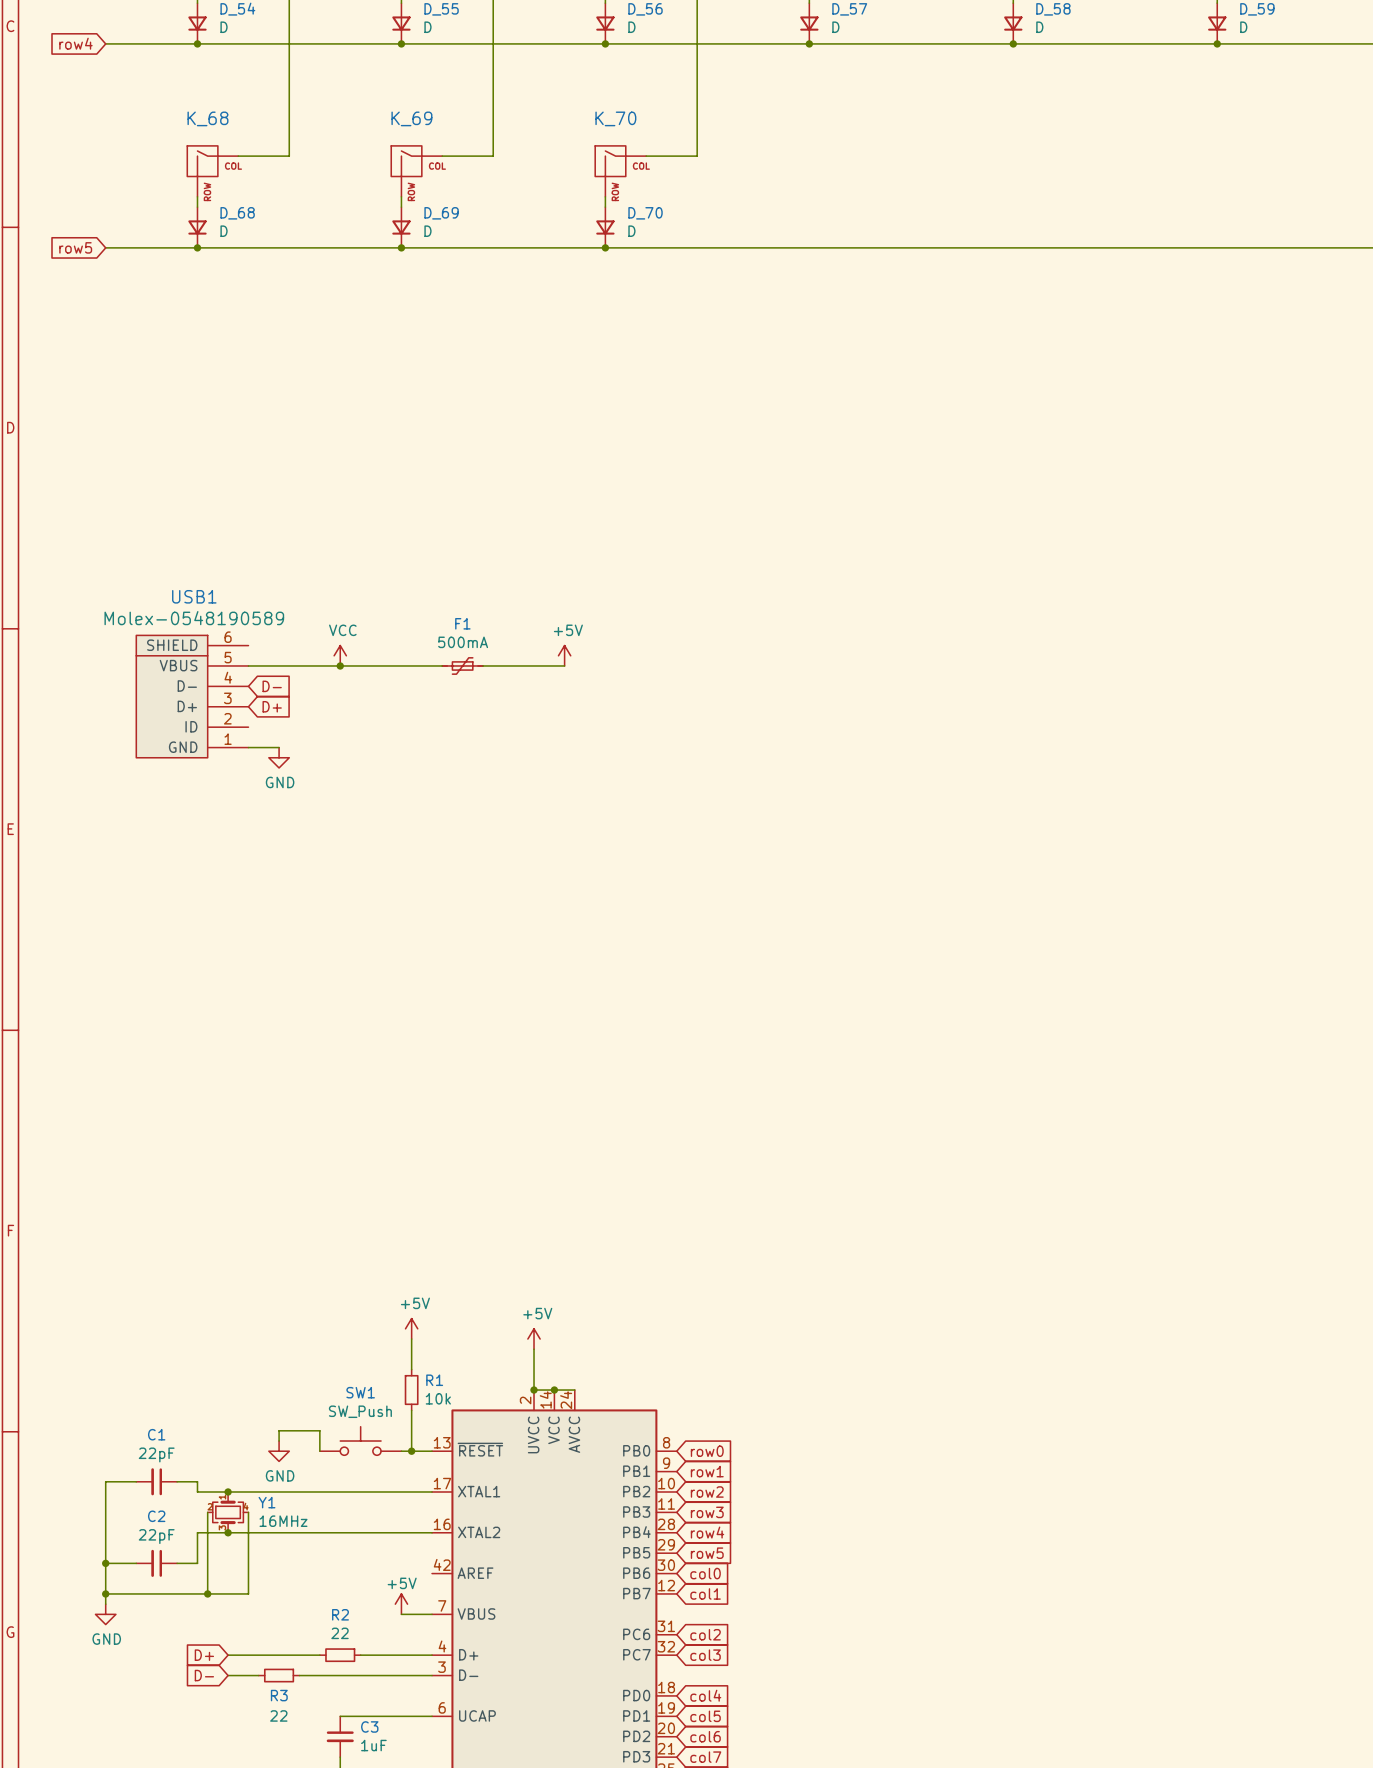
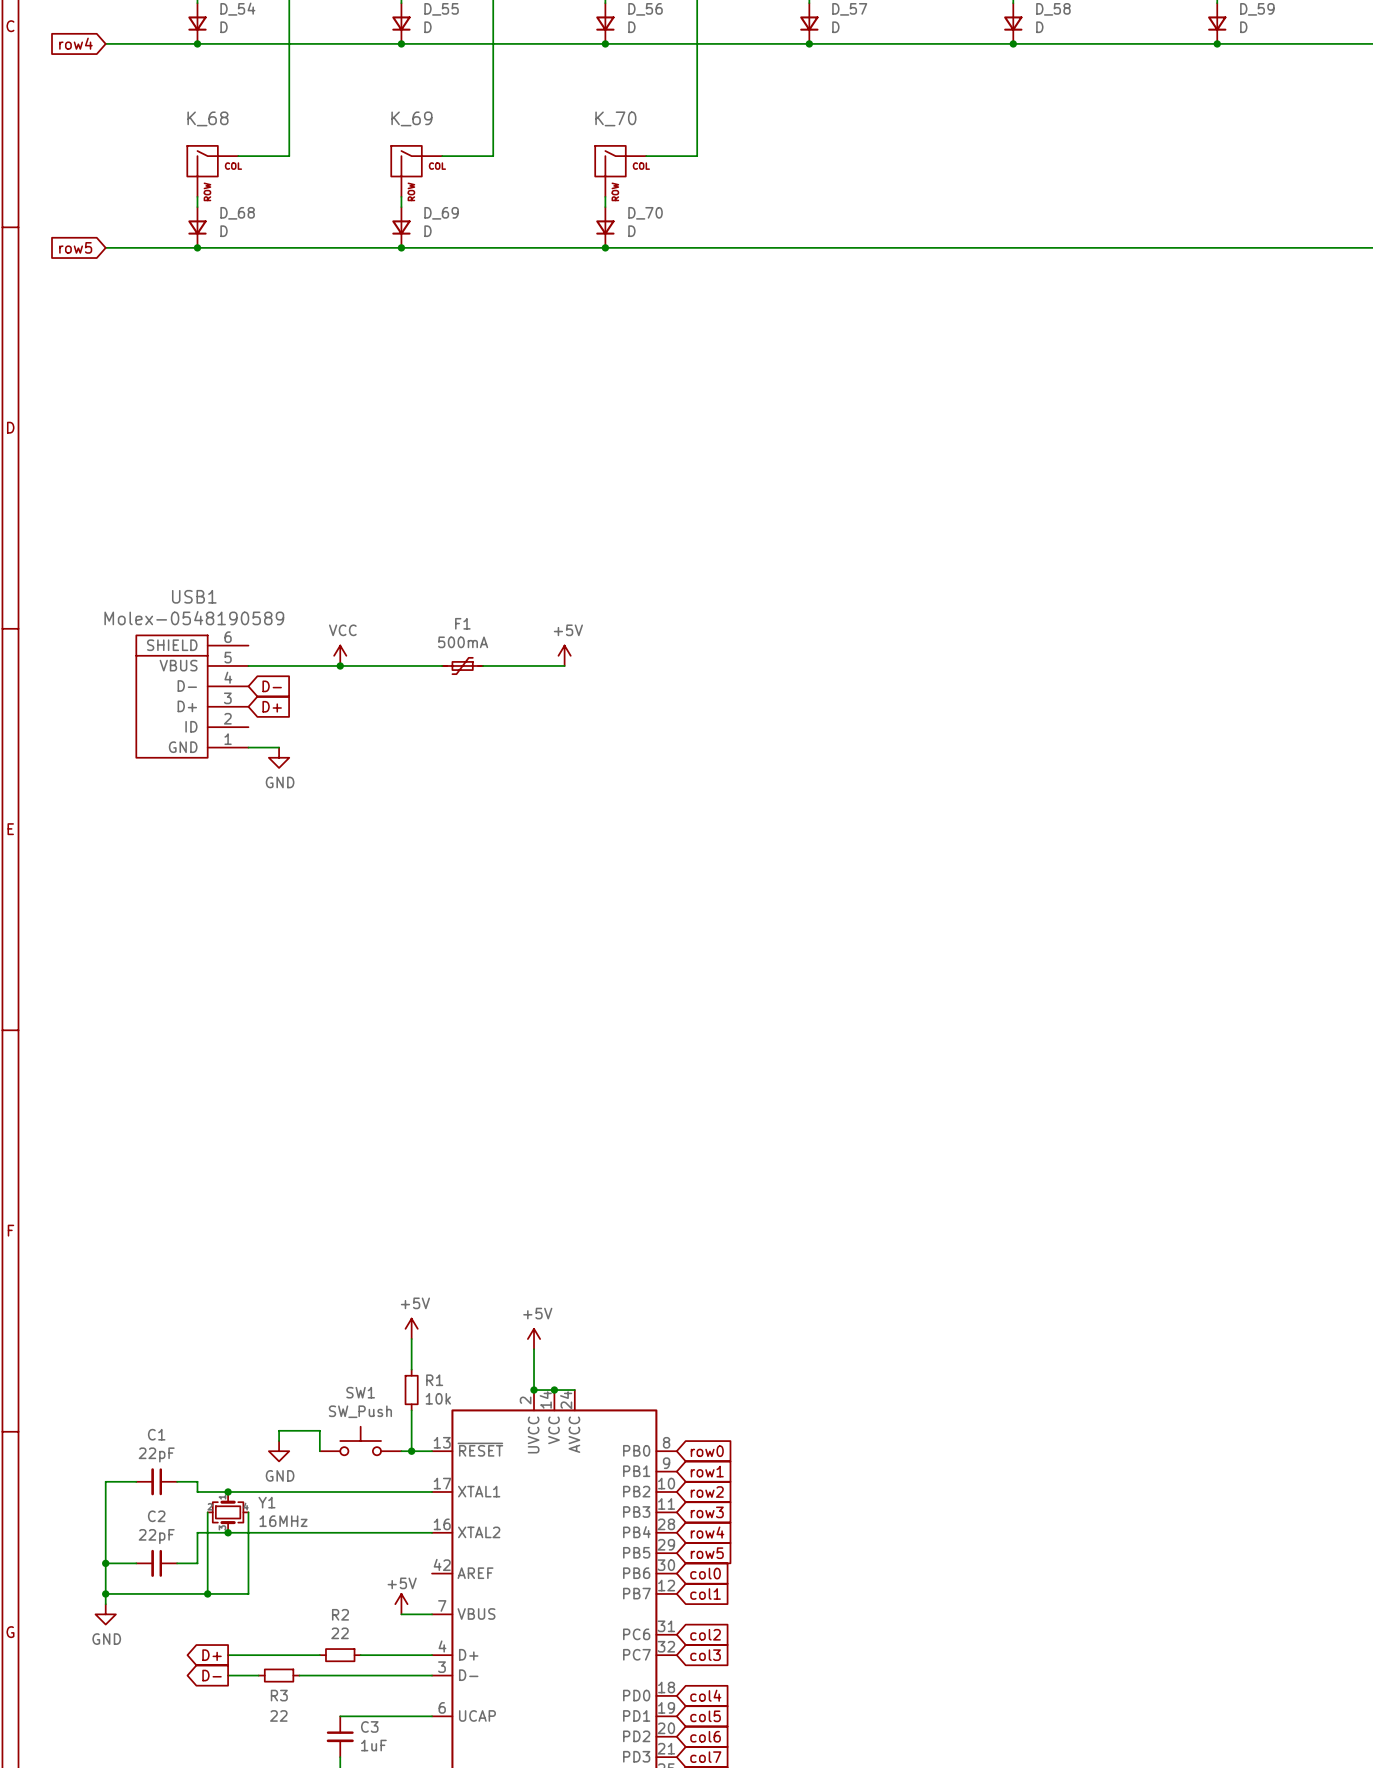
global label shape: input (204, 1655) -> output (212, 1655)
global label shape: input (204, 1675) -> output (212, 1675)

